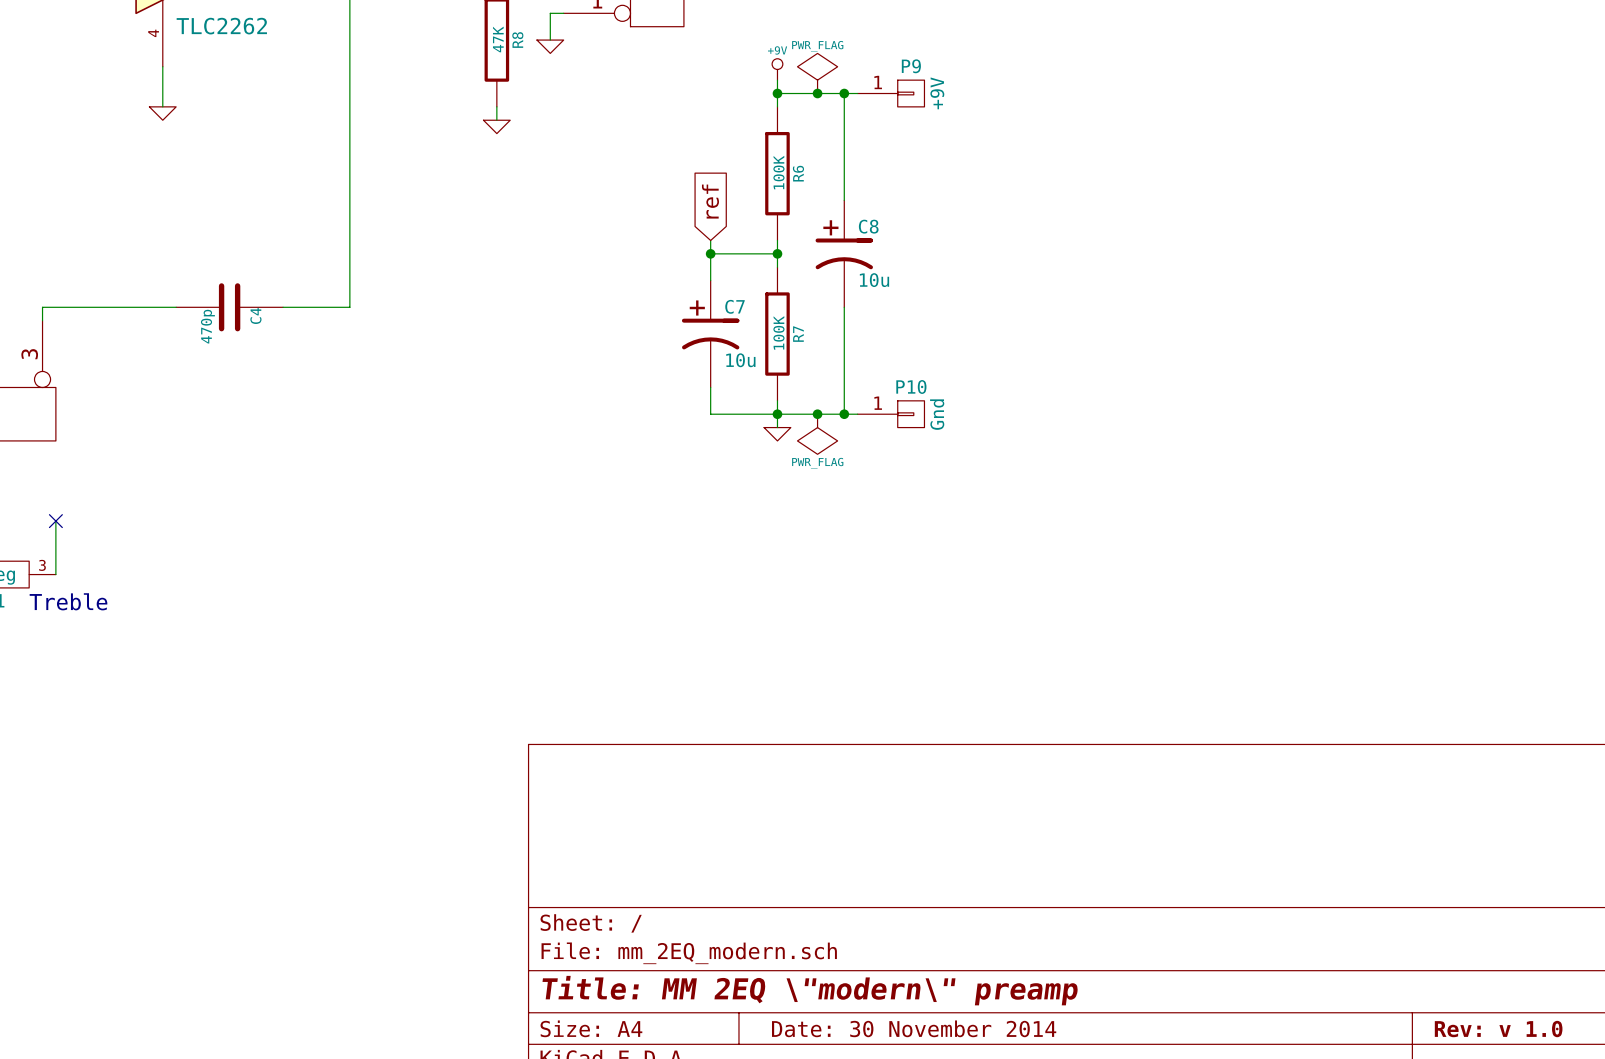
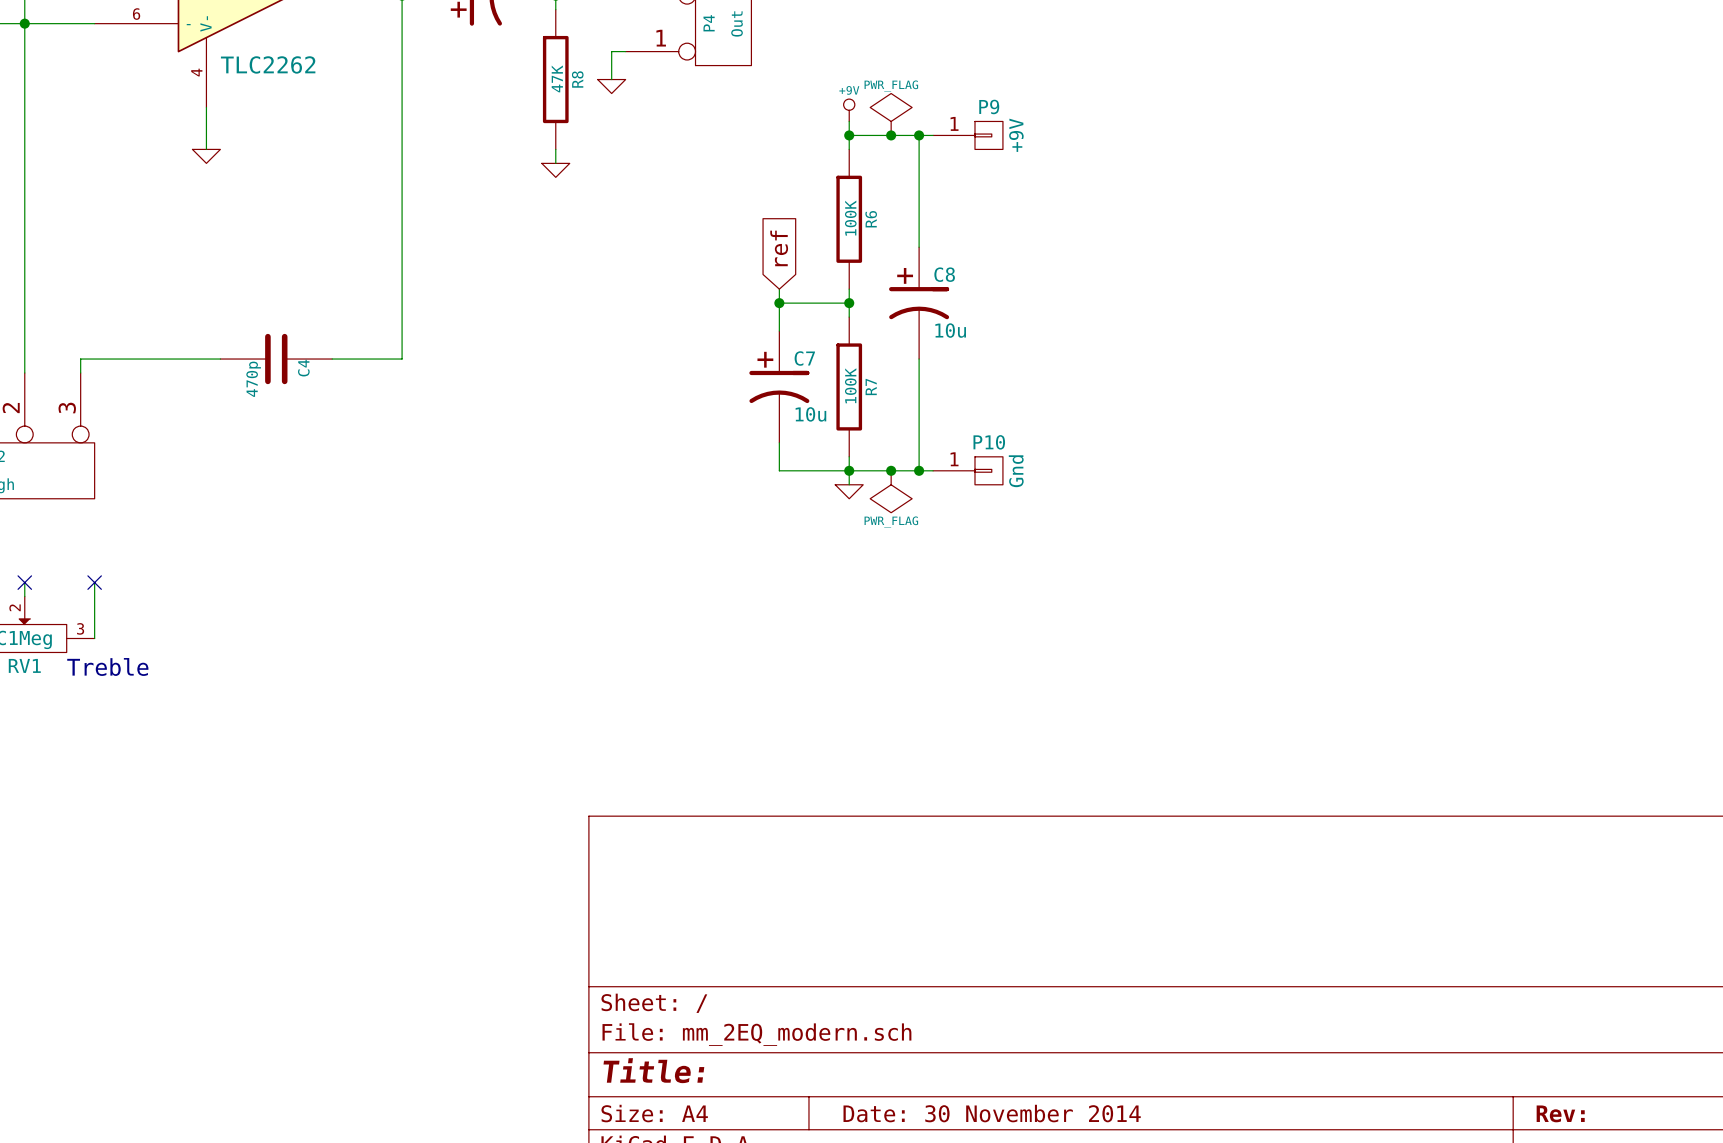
title block: Title: MM 2EQ \"modern\" preamp (810, 990) -> Title: (653, 1070)
title block: Rev: v 1.0 (1498, 1029) -> Rev: (1560, 1113)

